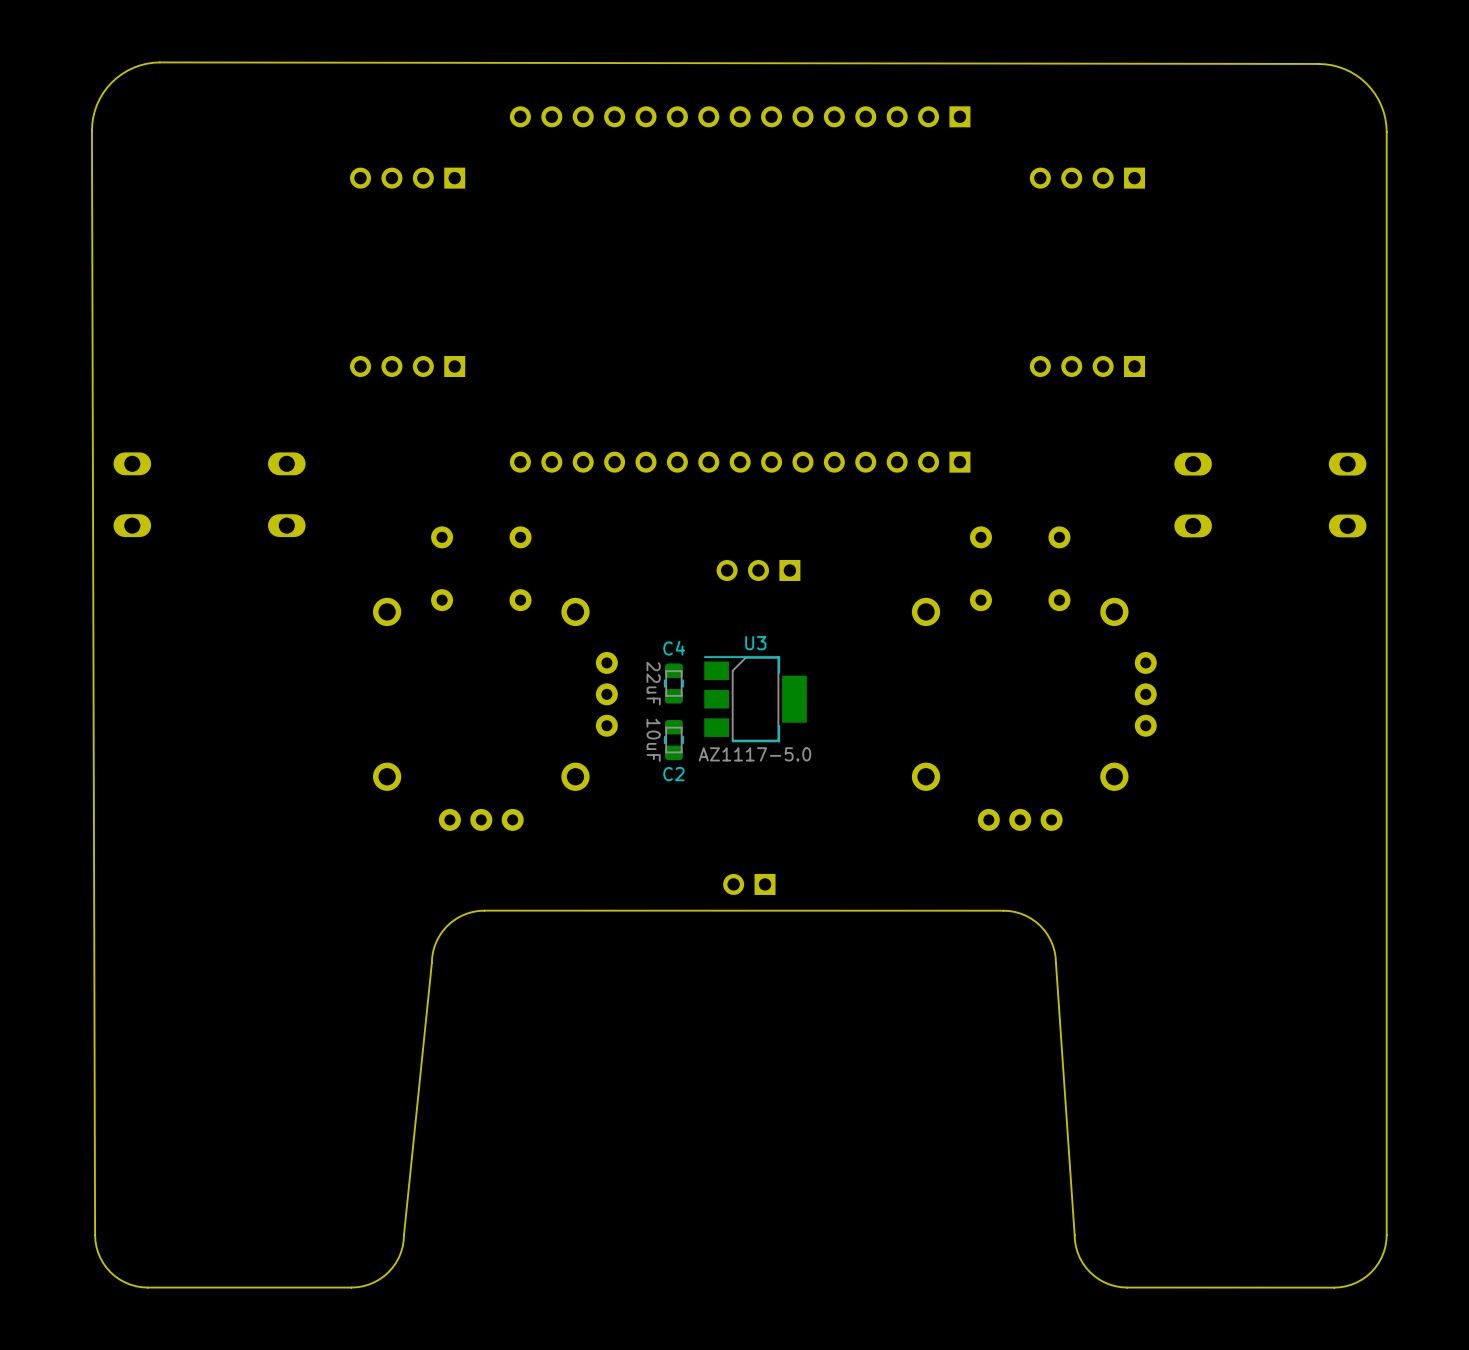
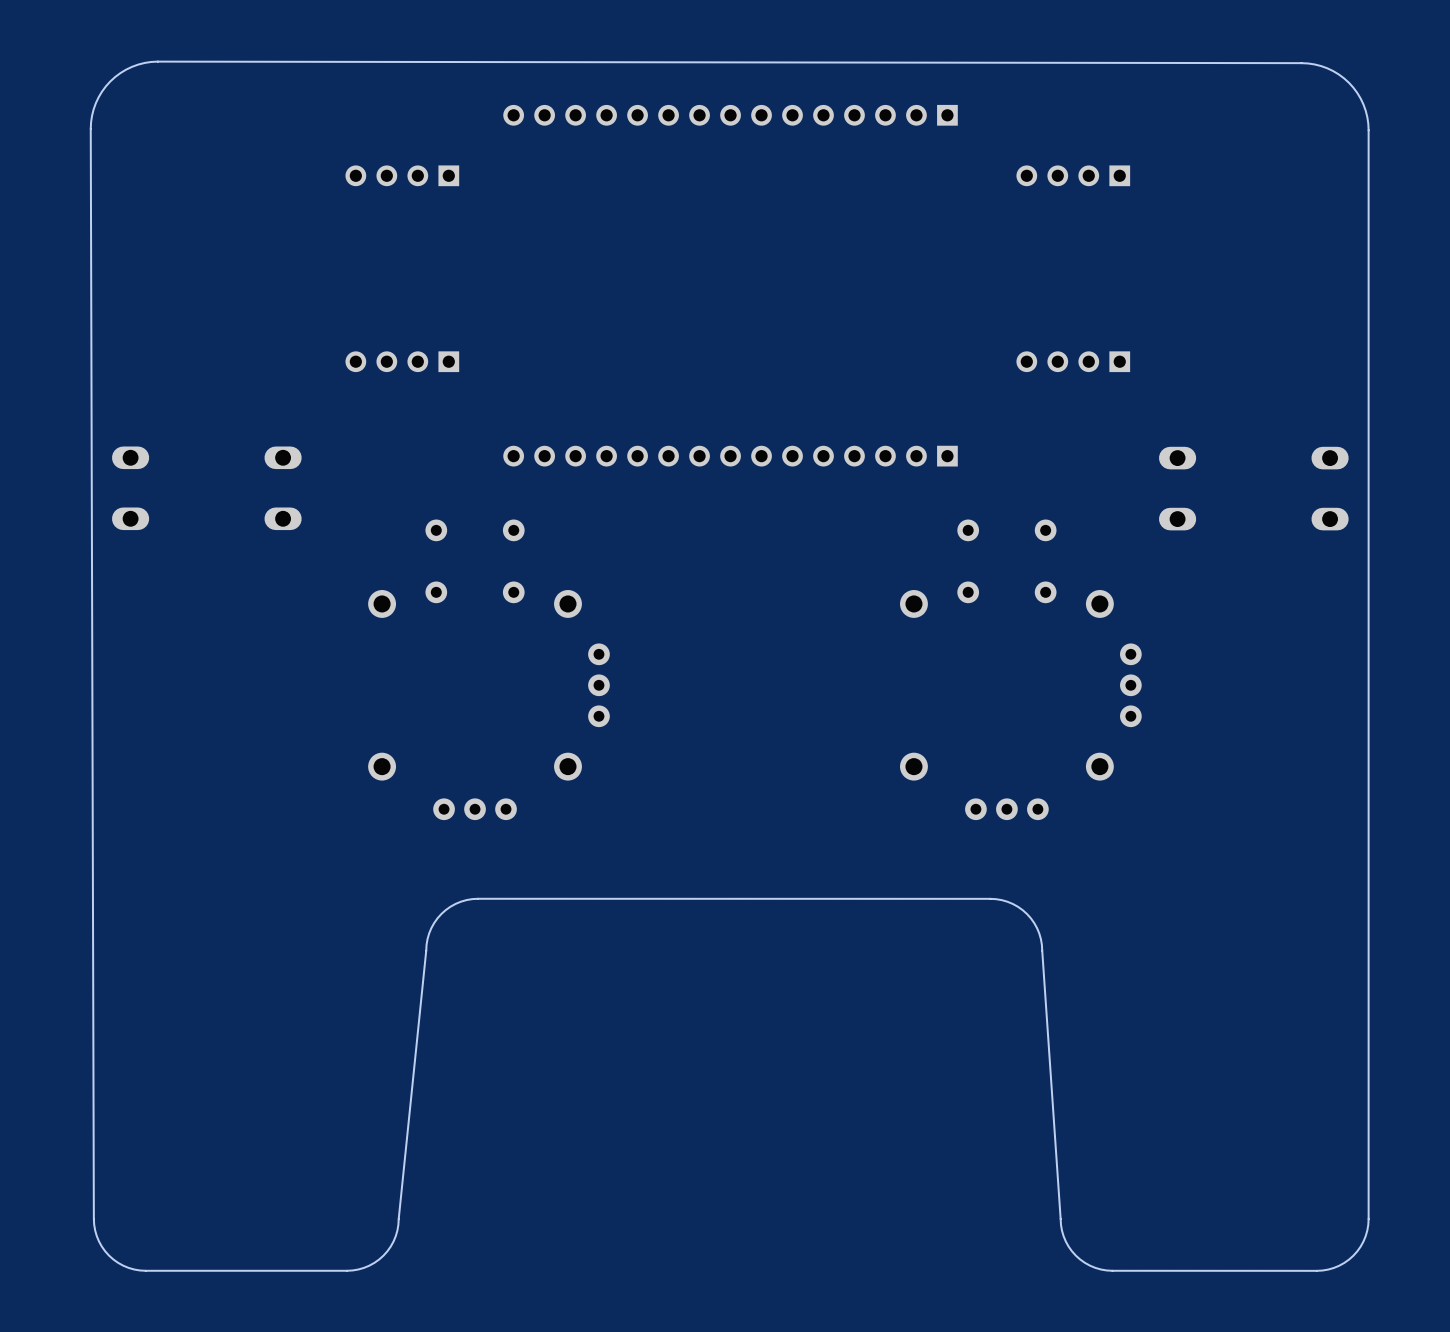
part: (758, 570) -> none
C4: 22uF (673, 683) -> none
U3: AZ1117-5.0 (755, 699) -> none
C2: 10uF (673, 740) -> none
part: (749, 884) -> none

